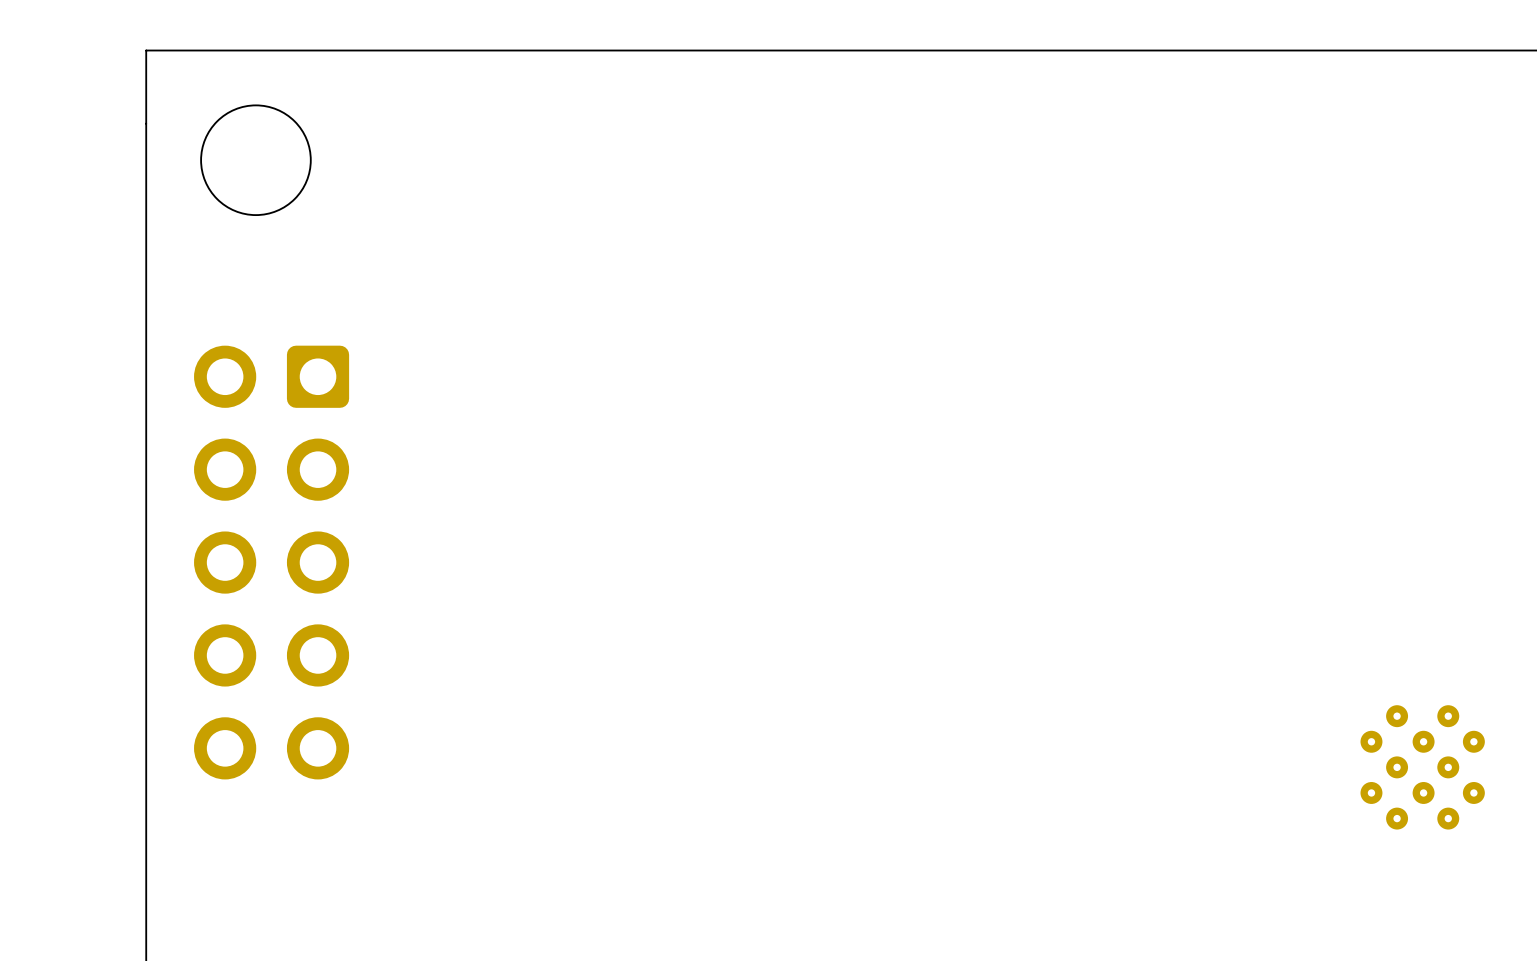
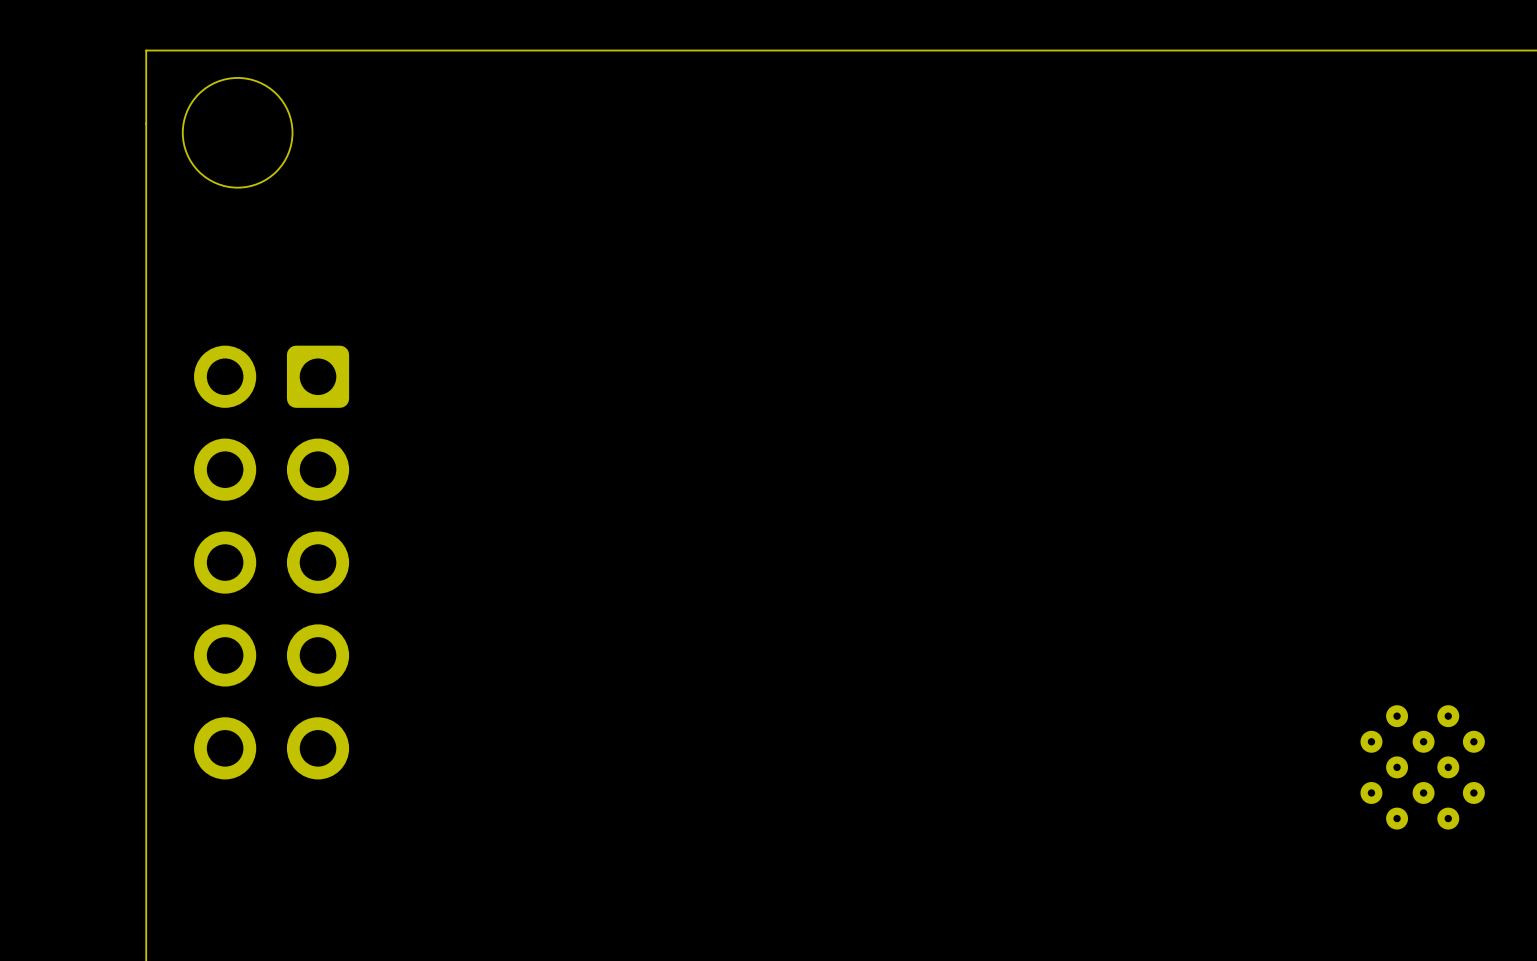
round board edge position: (255, 160) -> (237, 132)

